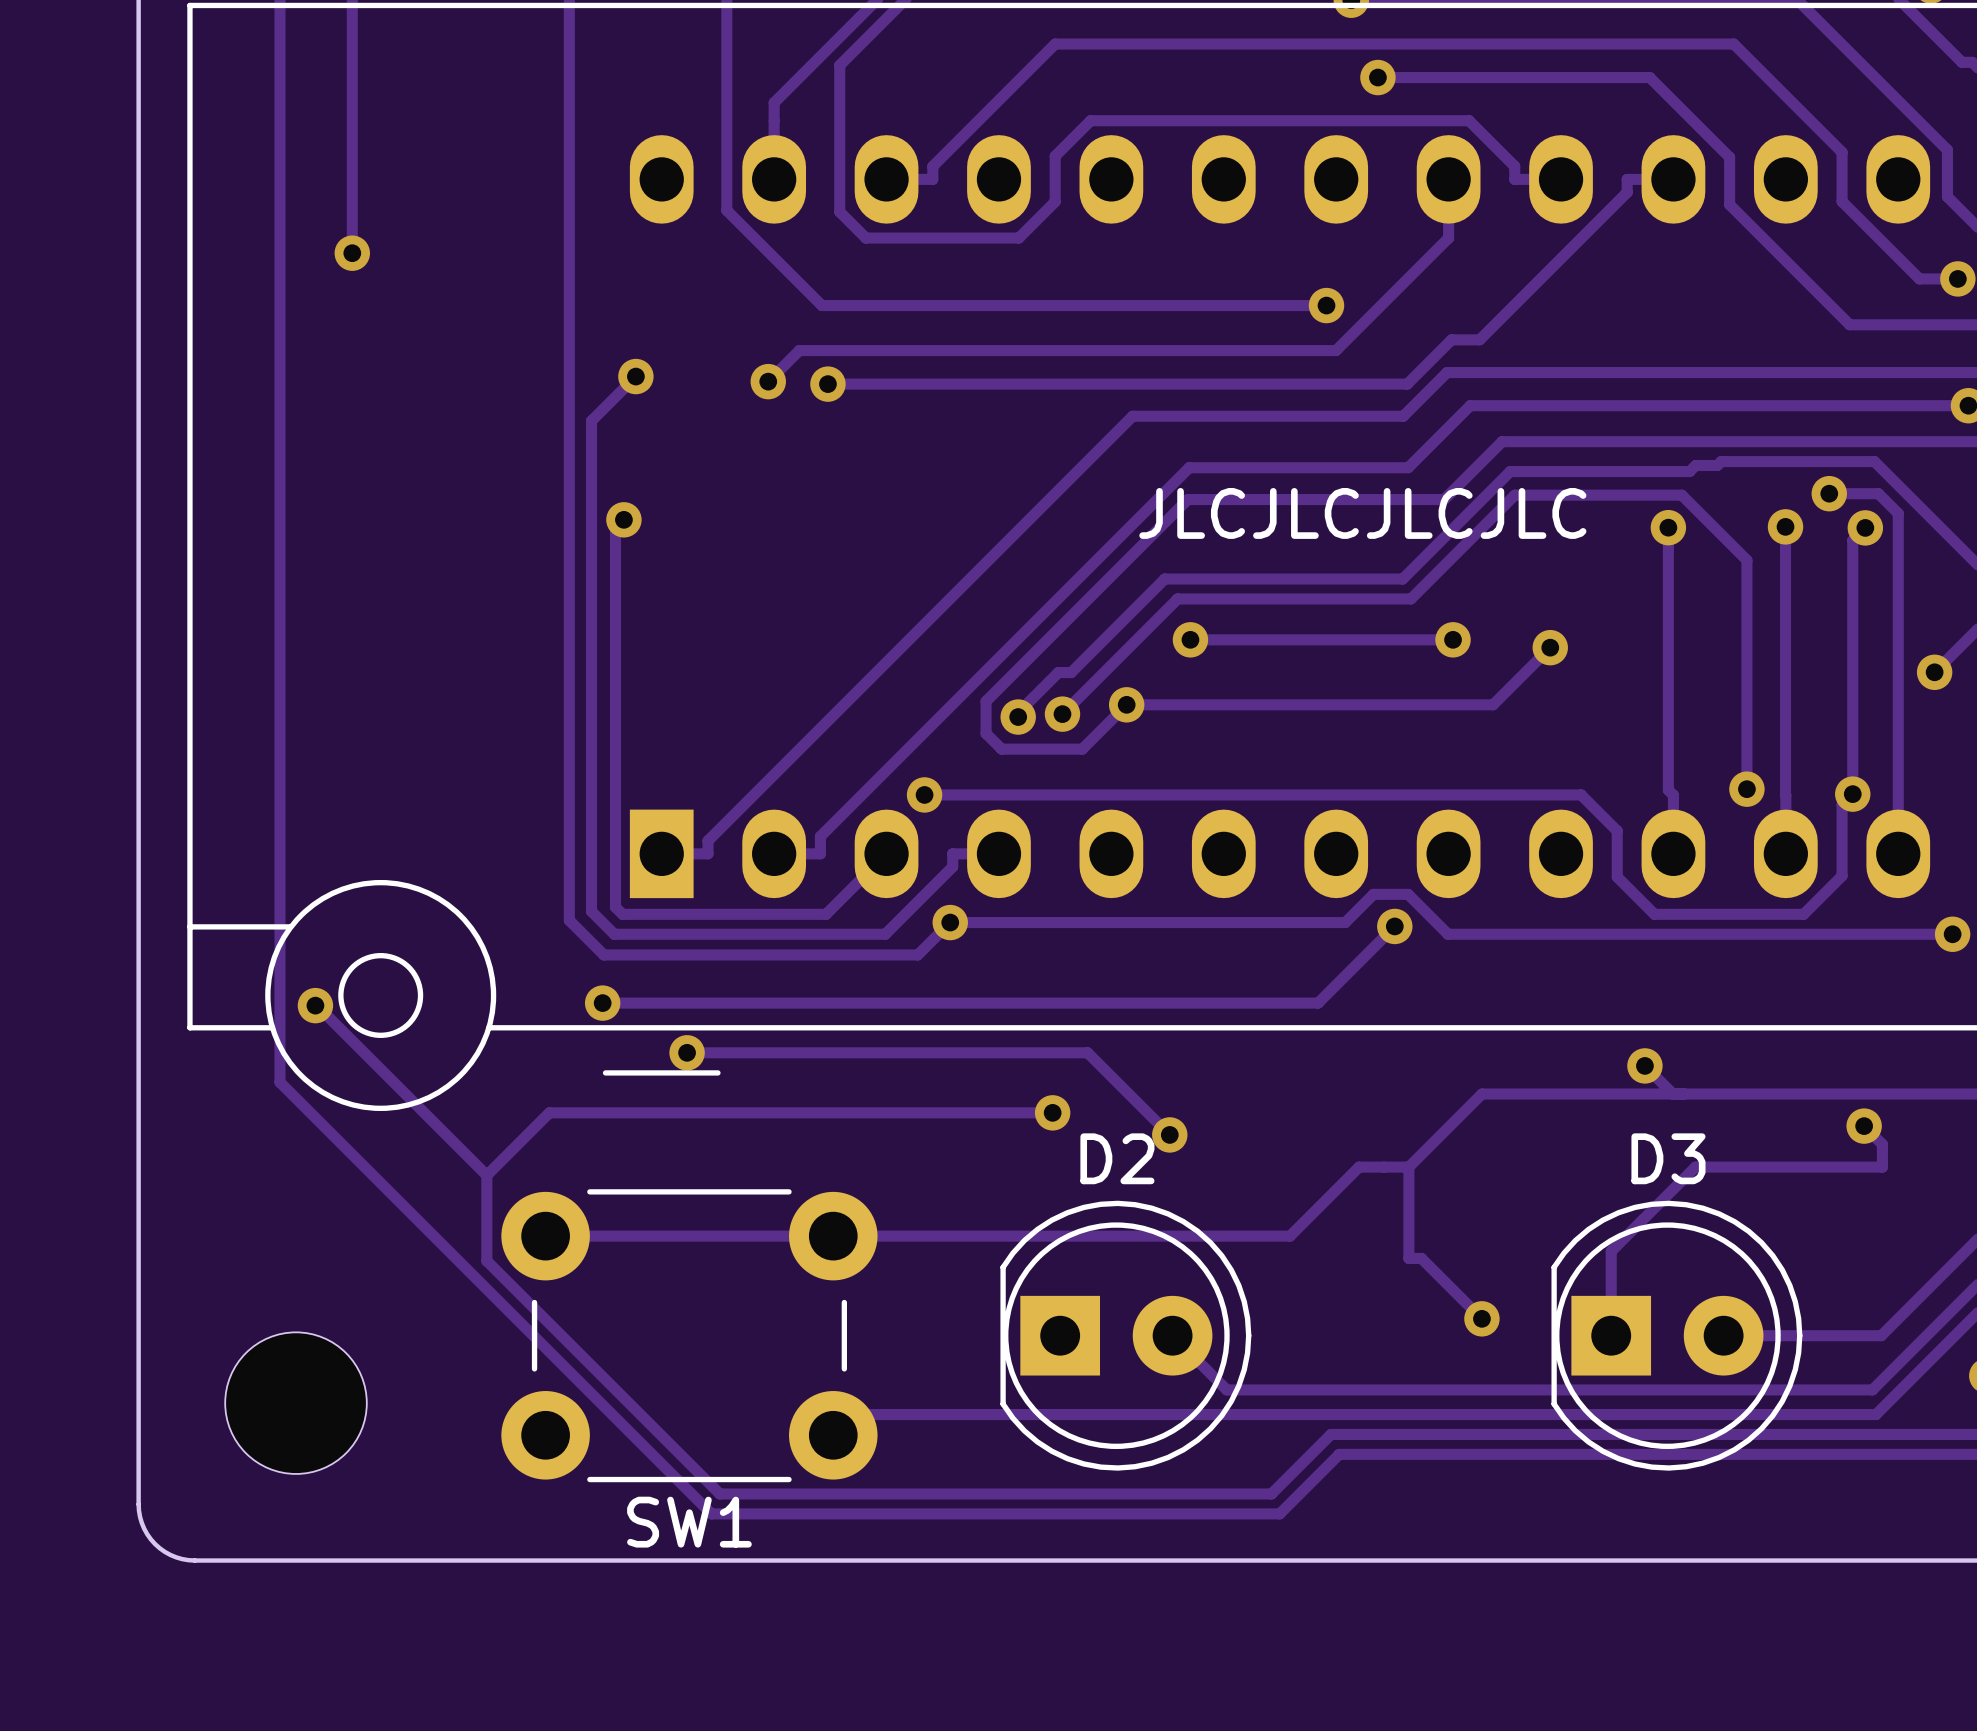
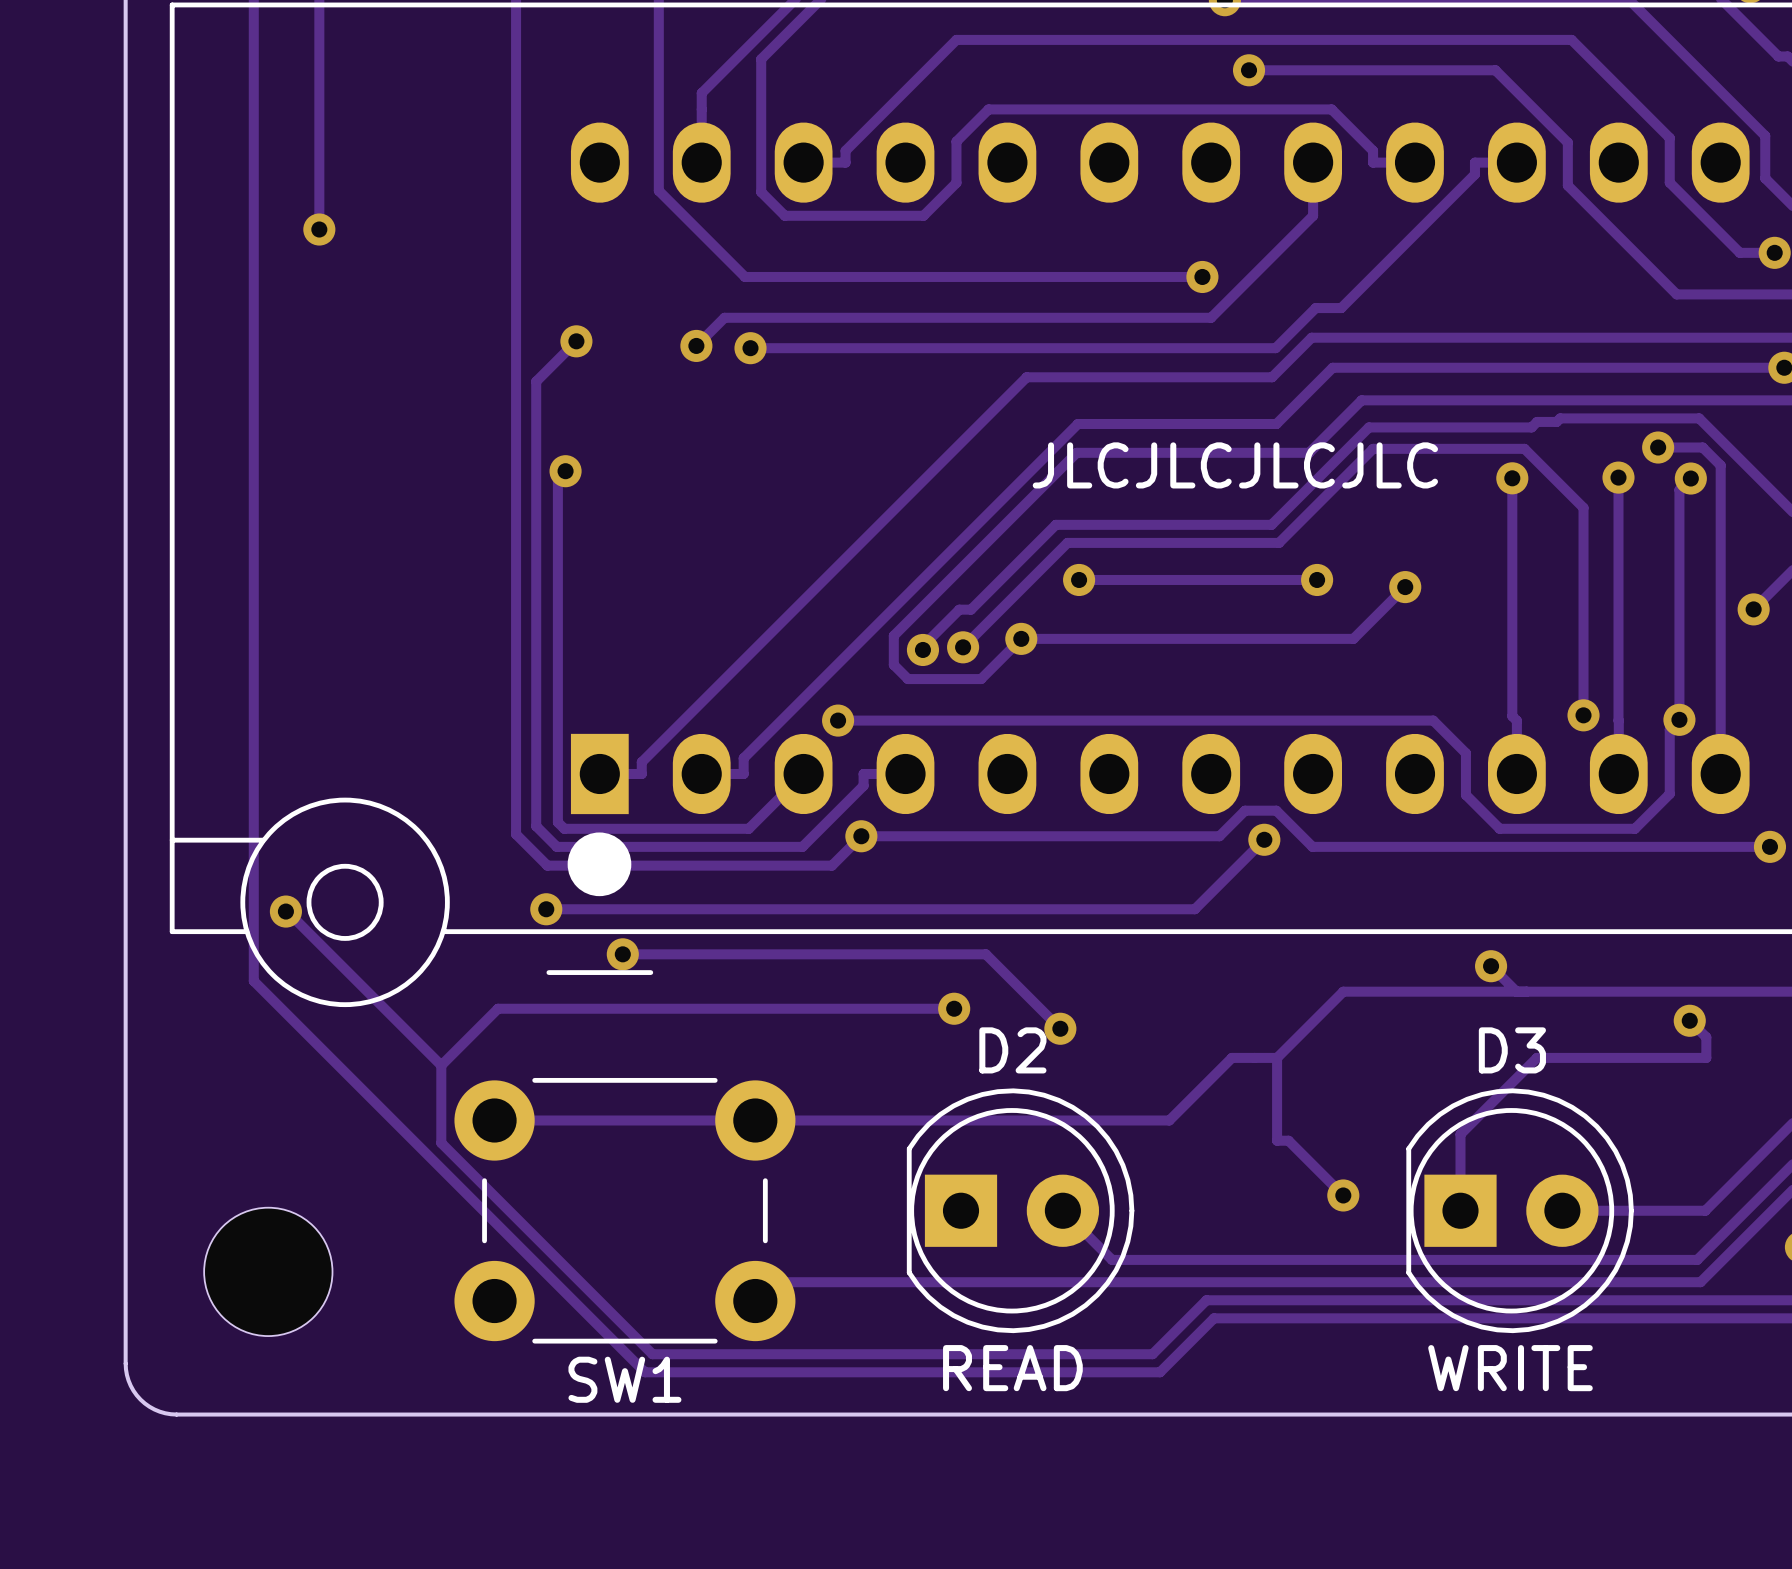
drawing: none -> [567, 832, 632, 897]
D2 value: none -> READ (1012, 1368)
D3 value: none -> WRITE (1510, 1368)

